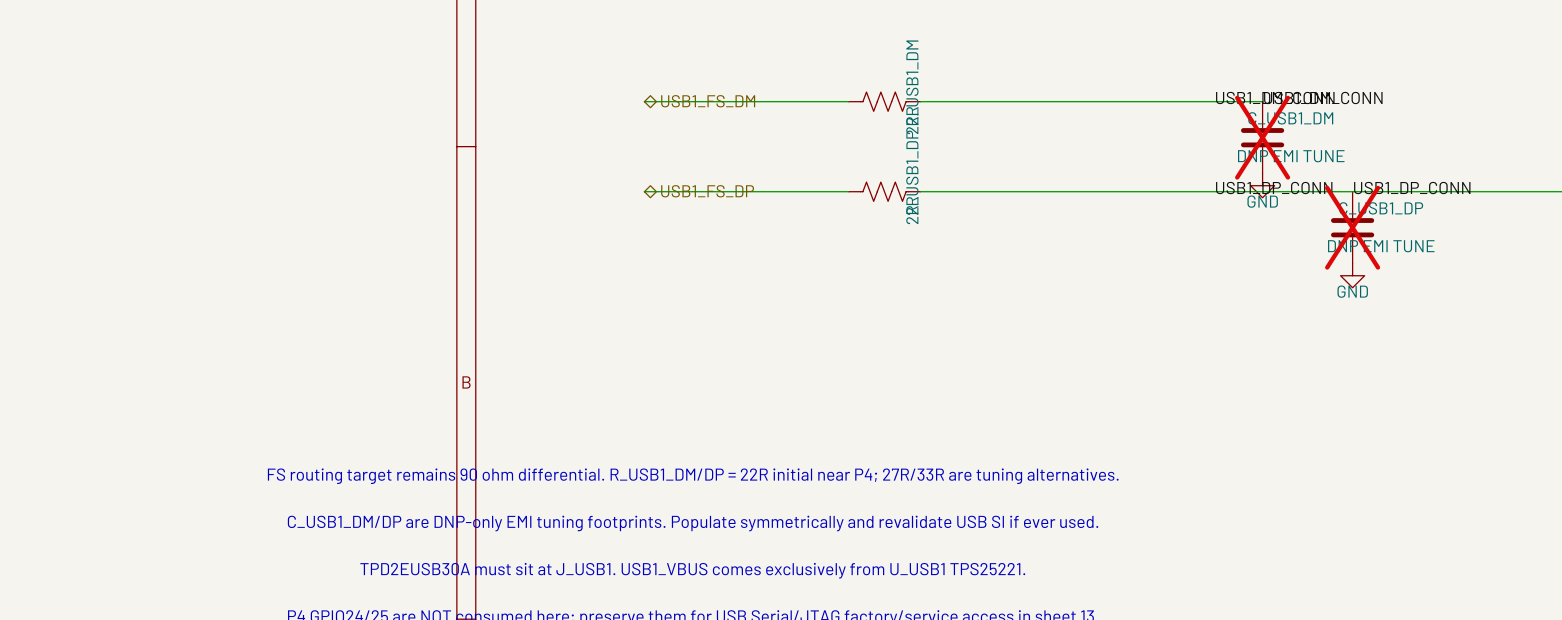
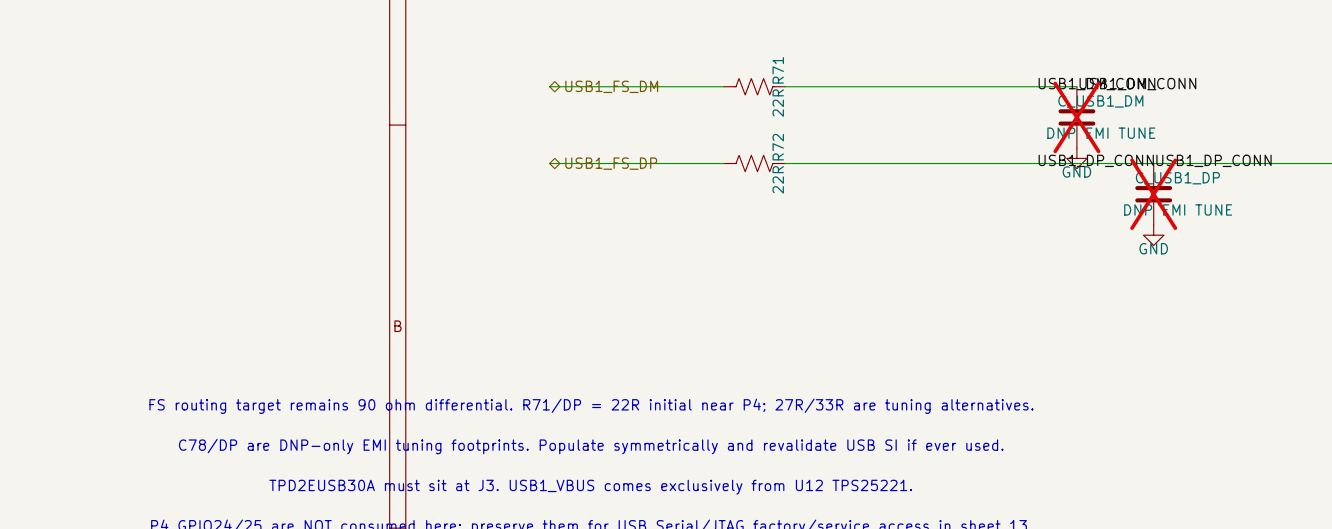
R_USB1_DM name: R_USB1_DM (912, 82) -> R71 (778, 70)
R_USB1_DP name: R_USB1_DP (912, 172) -> R72 (778, 147)
text: FS routing target remains 90 ohm differential. R_USB1_DM/DP = 22R initial near P4; 27R/33R are tuning alternatives. (693, 476) -> FS routing target remains 90 ohm differential. R71/DP = 22R initial near P4; 27R/33R are tuning alternatives. (591, 406)
text: C_USB1_DM/DP are DNP-only EMI tuning footprints. Populate symmetrically and revalidate USB SI if ever used. (693, 523) -> C78/DP are DNP-only EMI tuning footprints. Populate symmetrically and revalidate USB SI if ever used. (591, 446)
text: TPD2EUSB30A must sit at J_USB1. USB1_VBUS comes exclusively from U_USB1 TPS25221. (692, 570) -> TPD2EUSB30A must sit at J3. USB1_VBUS comes exclusively from U12 TPS25221. (590, 487)

